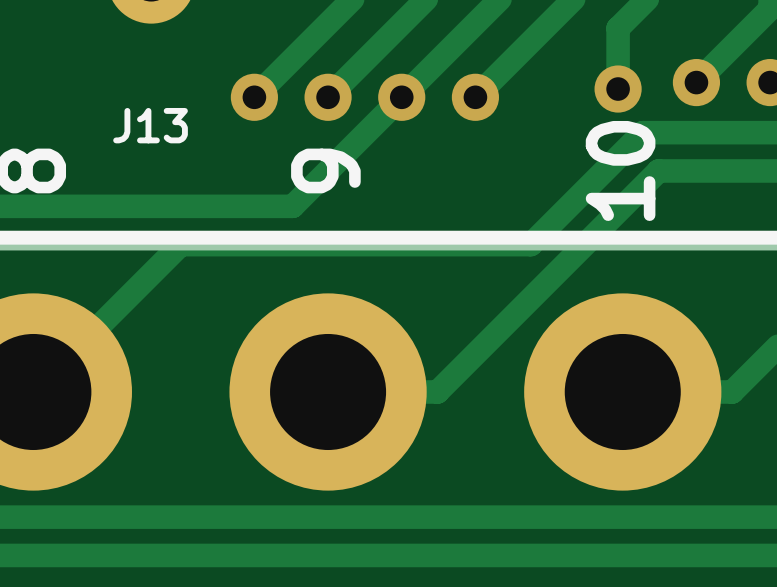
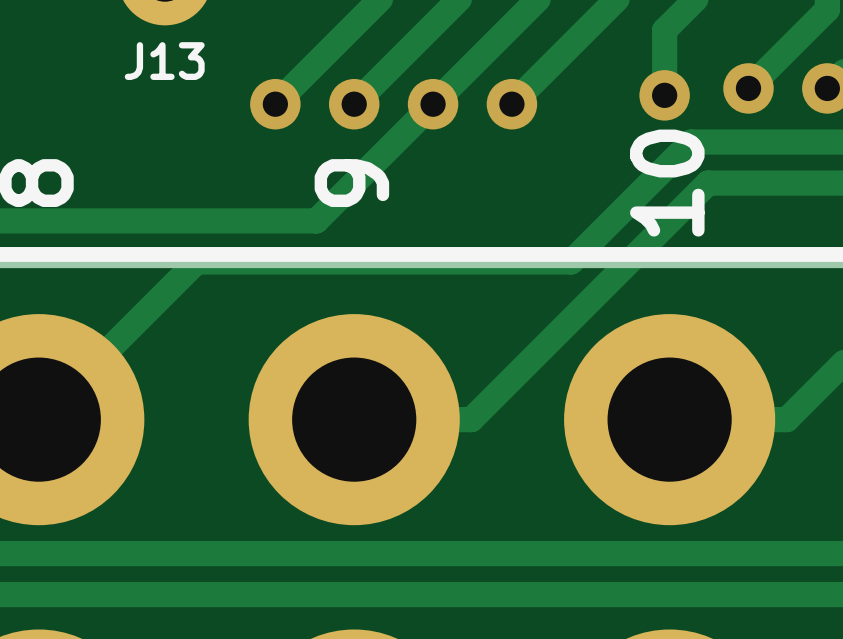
J13 name position: J13 (150, 125) -> J13 (164, 61)

